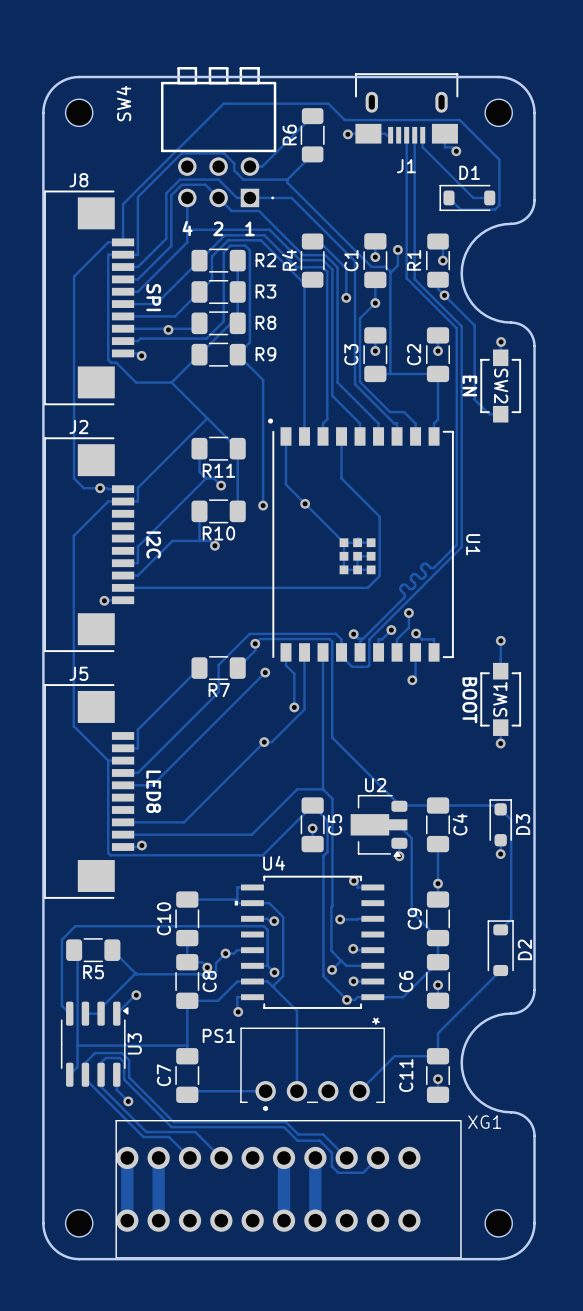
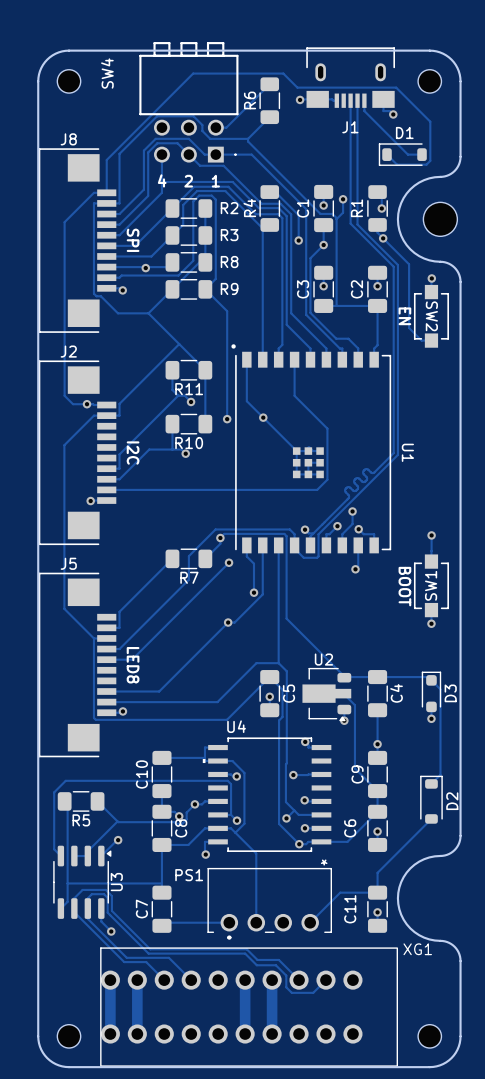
part: none -> (440, 219)

